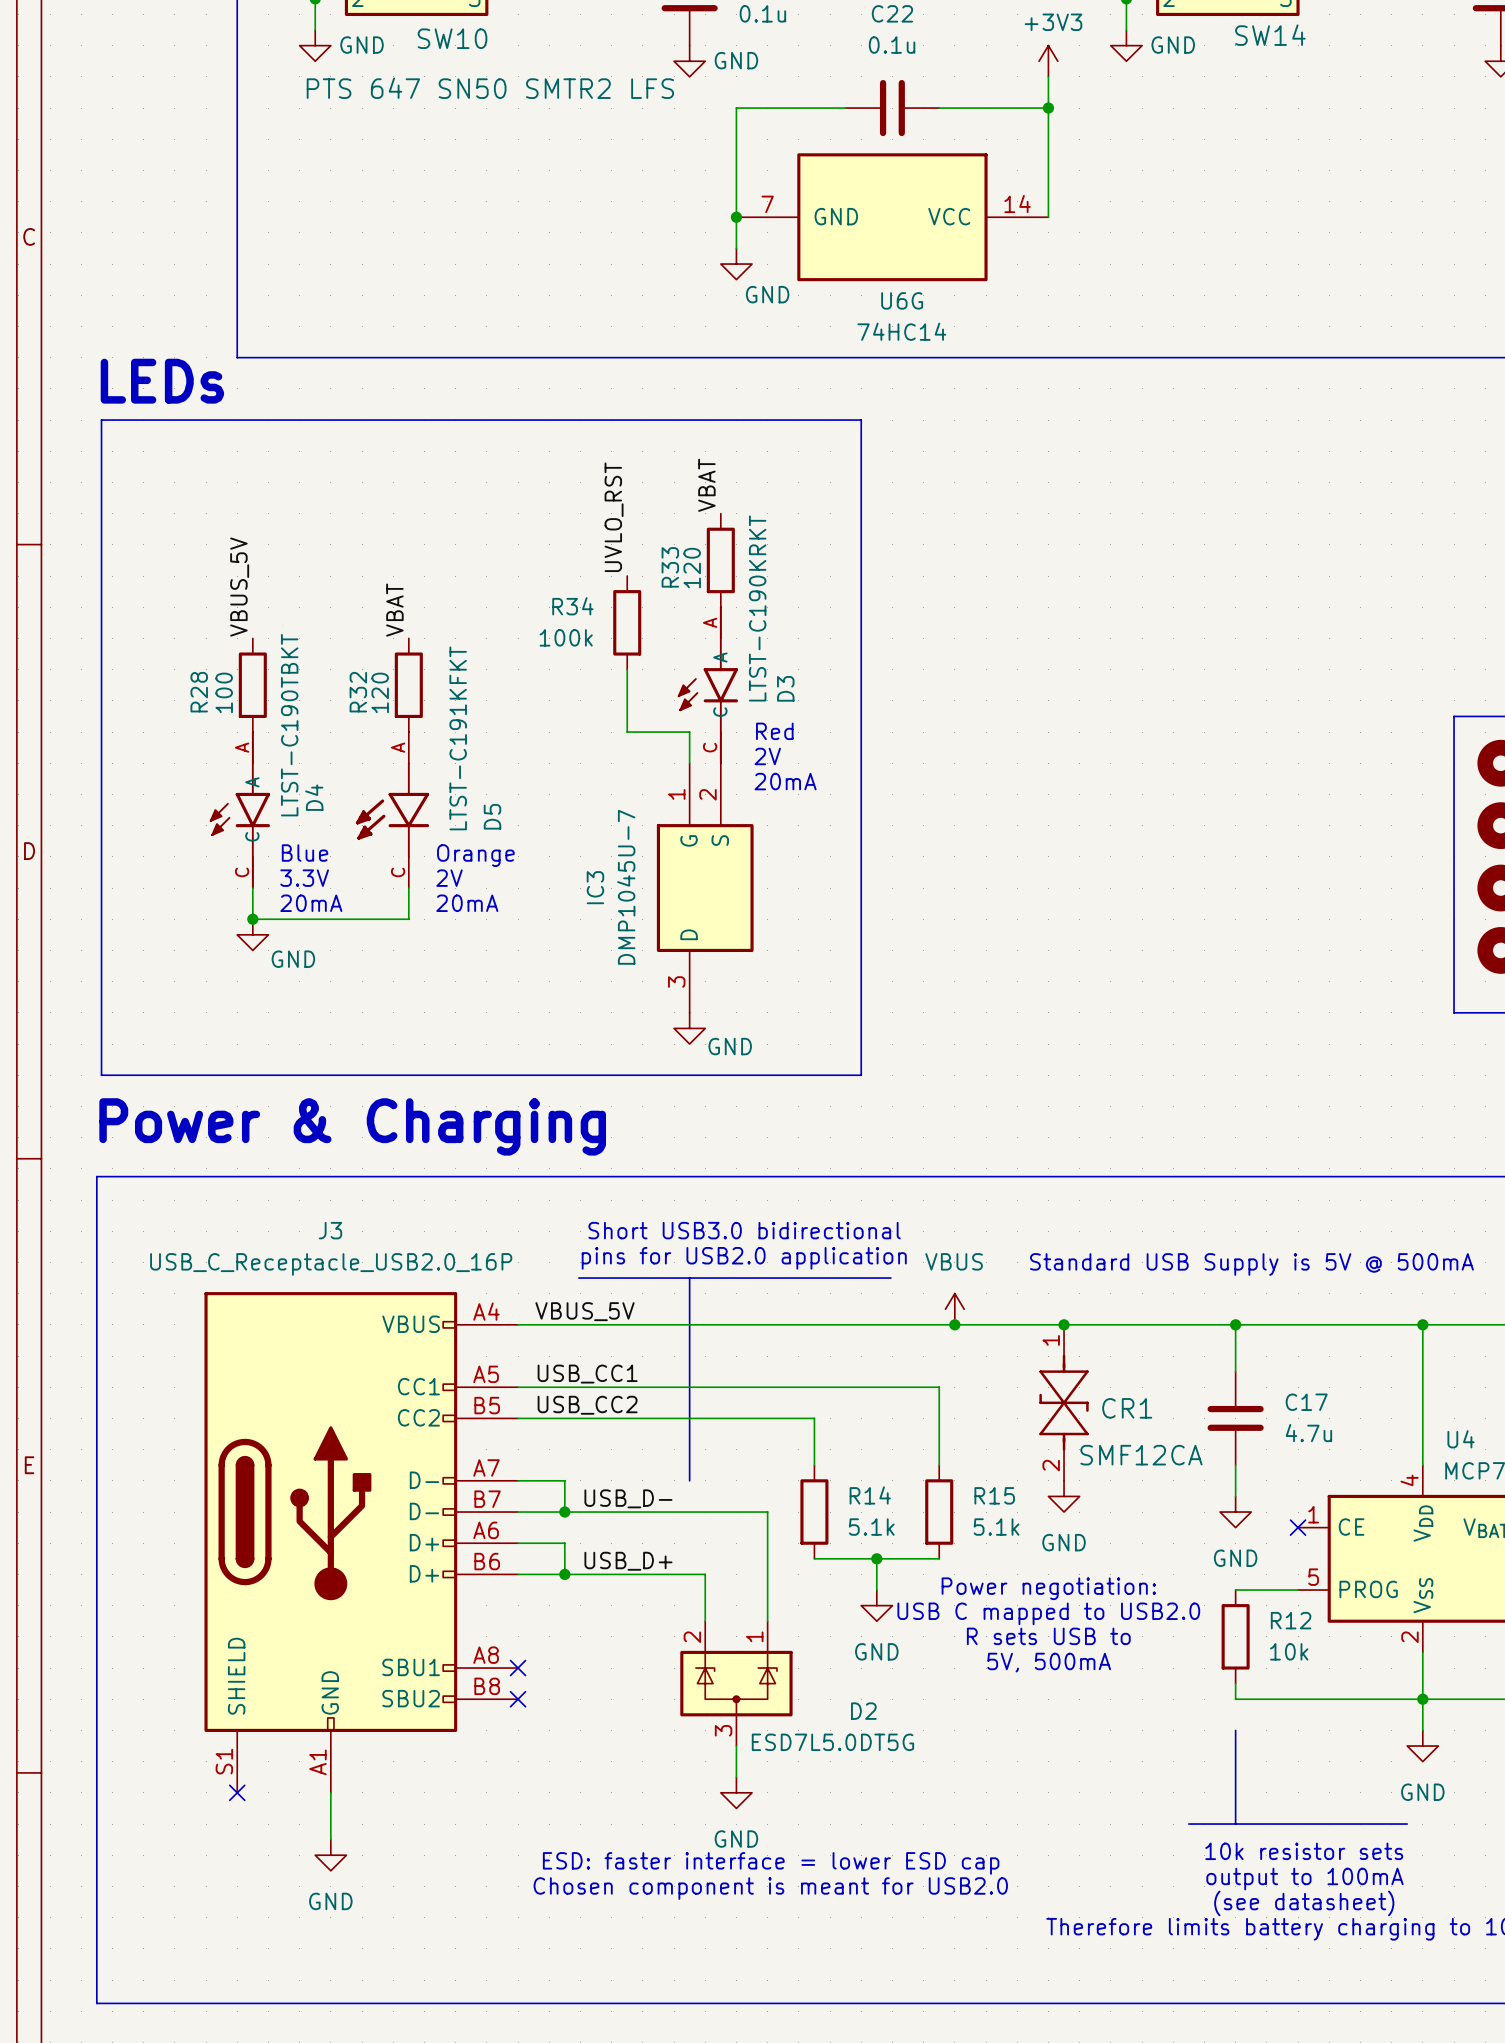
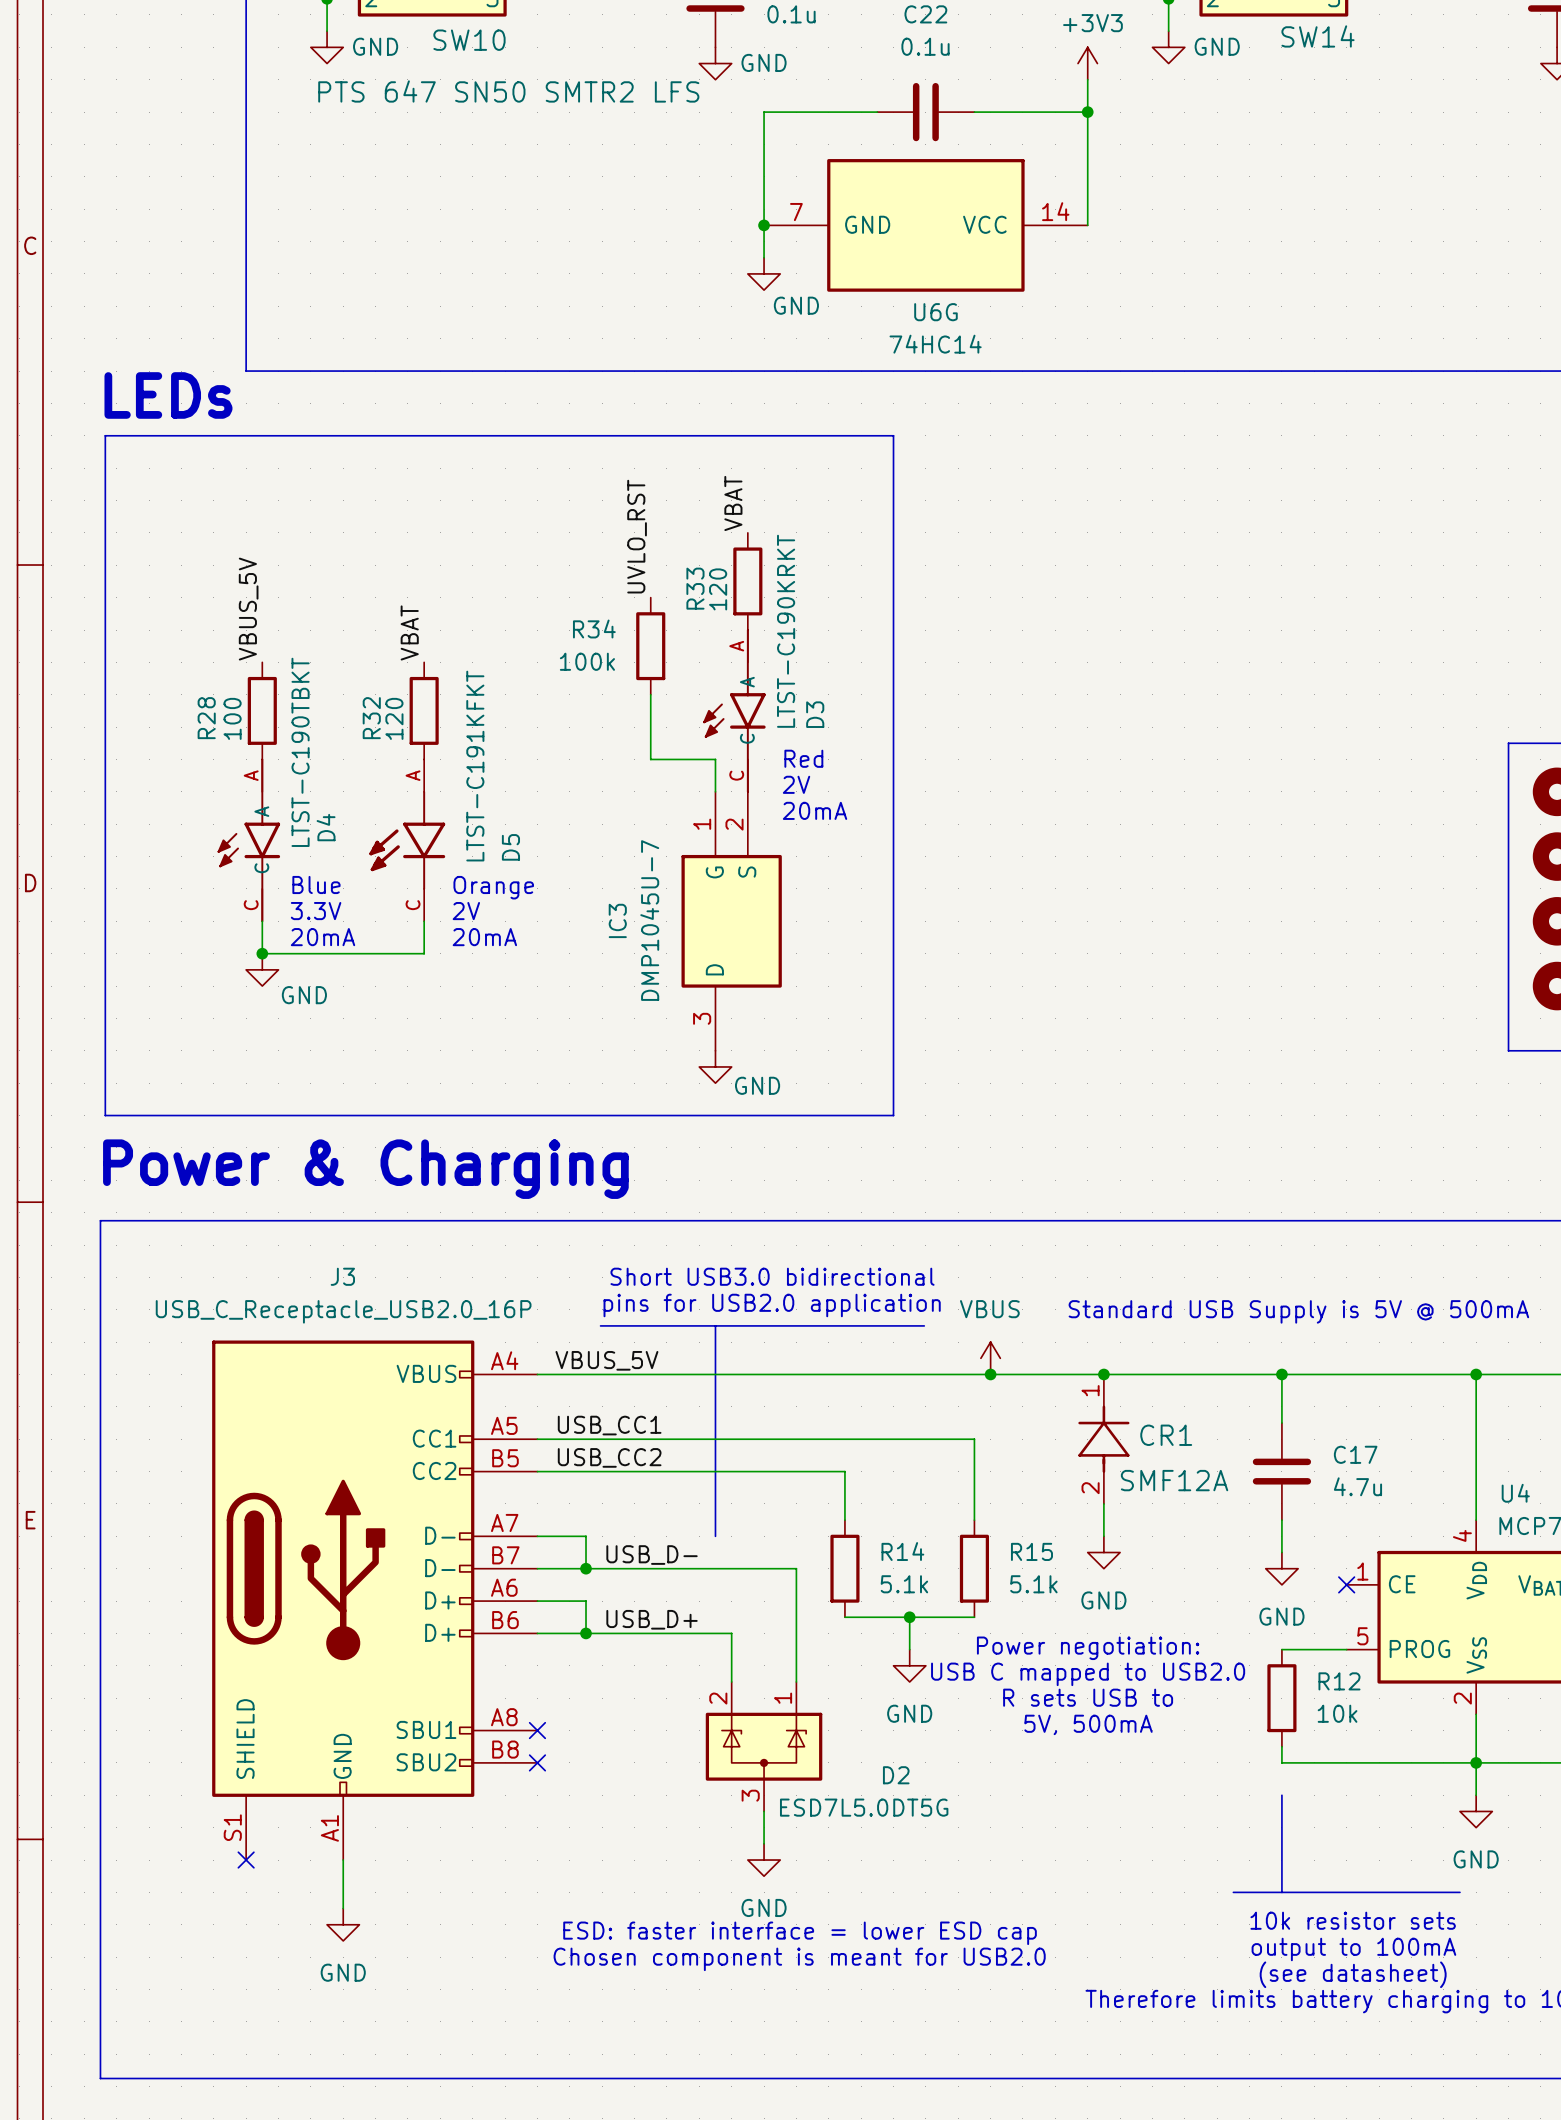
CR1 symbol: [1039, 1324, 1089, 1481] -> [1078, 1374, 1130, 1504]
CR1 value: SMF12CA (1141, 1455) -> SMF12A (1174, 1480)

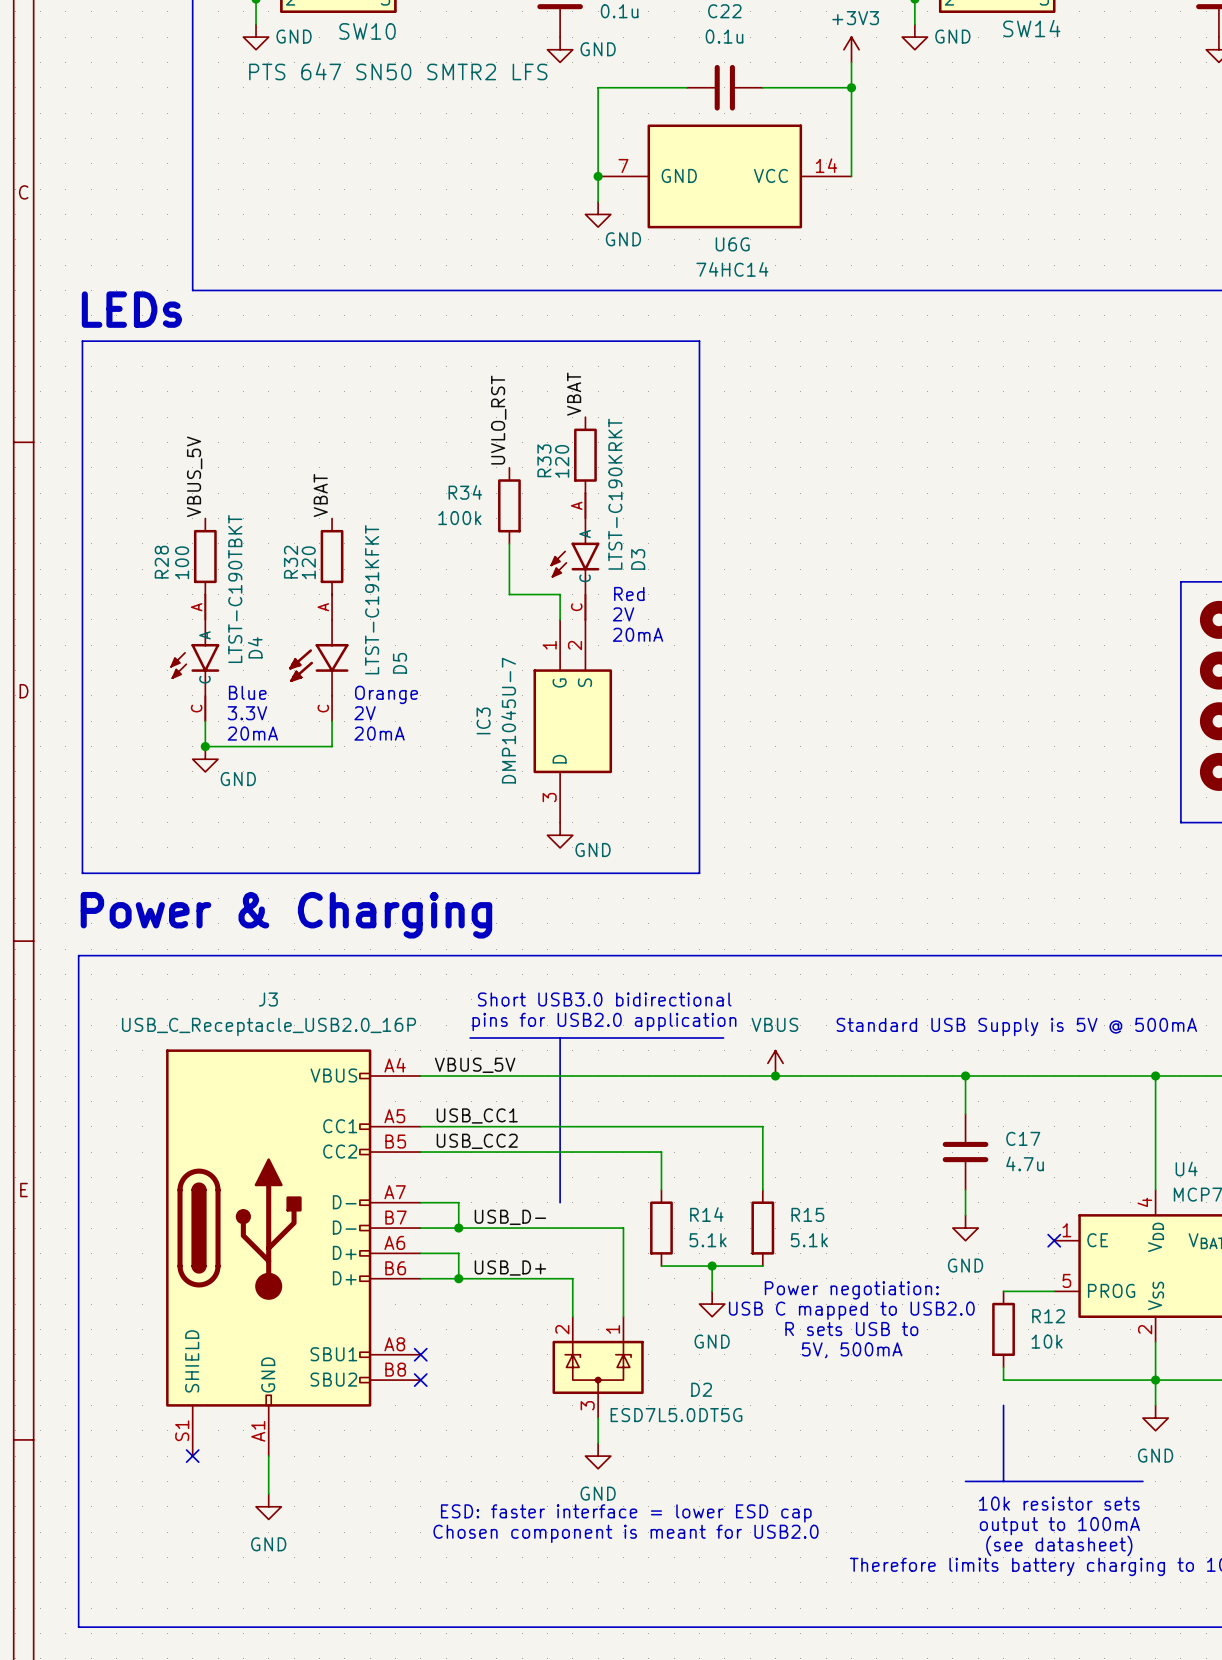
junction: (1103, 1374) -> none
wire: (1281, 1374) (1281, 1423) -> (965, 1076) (965, 1114)
junction position: (1281, 1374) -> (965, 1076)
CR1: SMF12A (1103, 1439) -> none
C17 position: (1281, 1471) -> (965, 1152)
wire: (1103, 1503) (1103, 1536) -> none
wire: (1281, 1520) (1281, 1552) -> (965, 1190) (965, 1215)
power symbol: GND (1103, 1552) -> none
power symbol position: GND (1281, 1568) -> GND (965, 1228)

